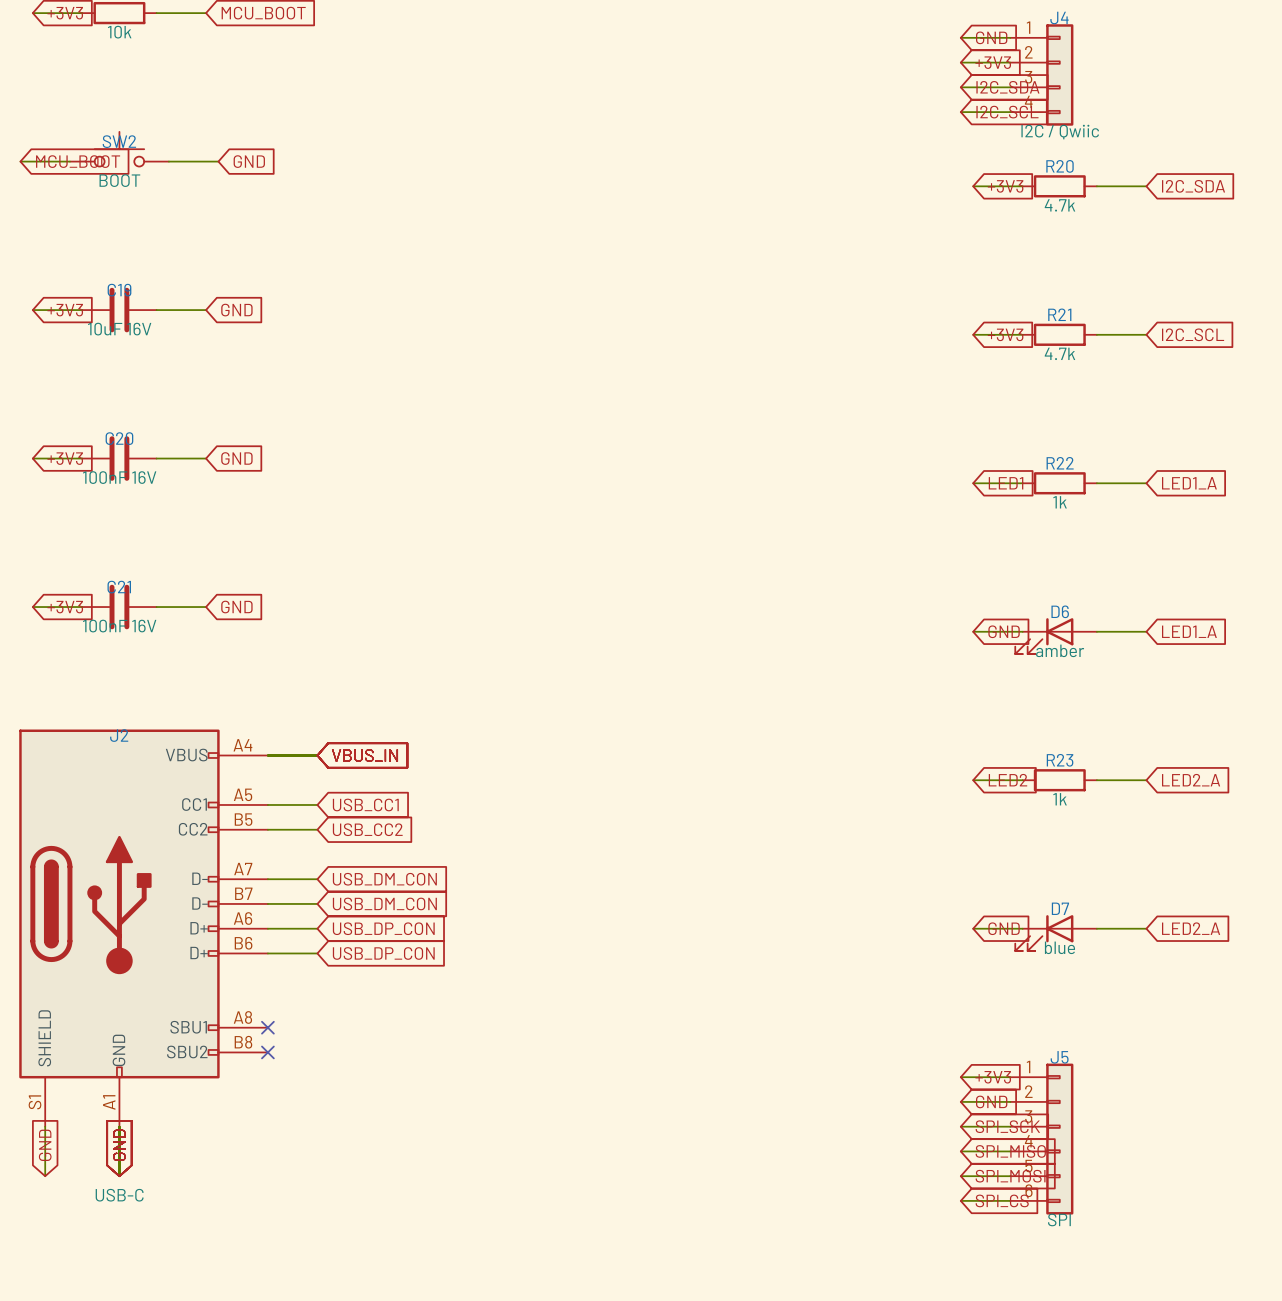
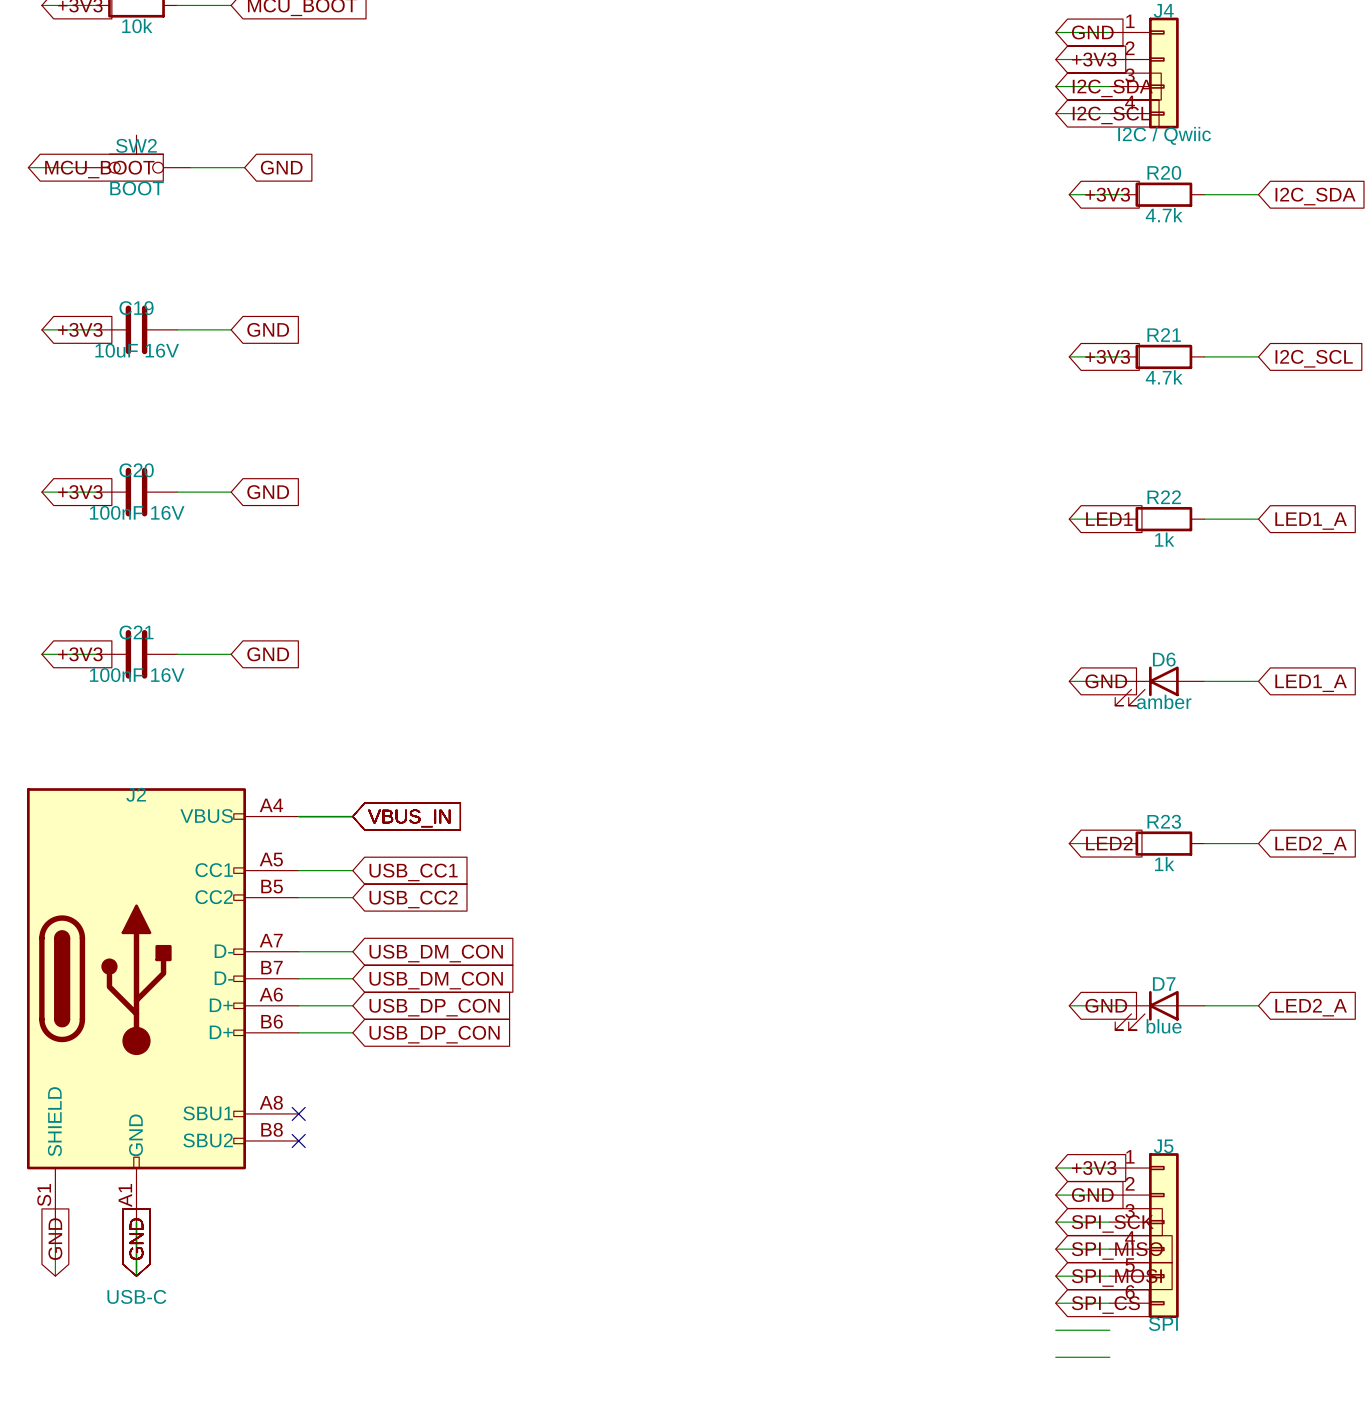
wire: none -> (1055, 1330) (1109, 1330)
wire: none -> (1055, 1357) (1109, 1357)

